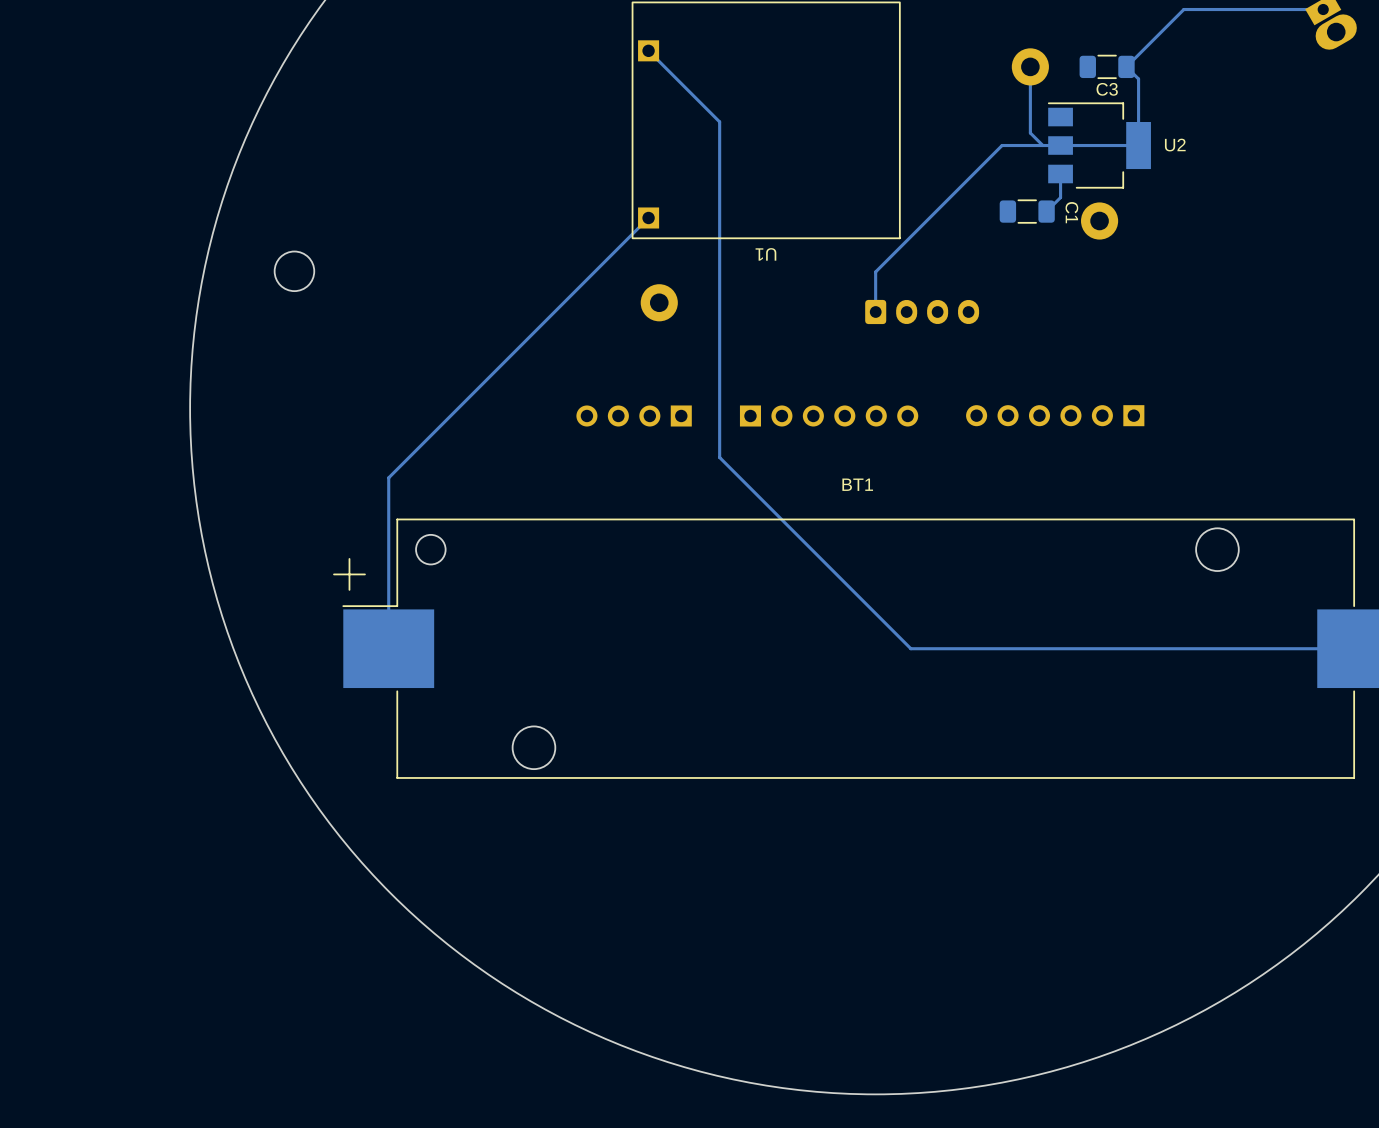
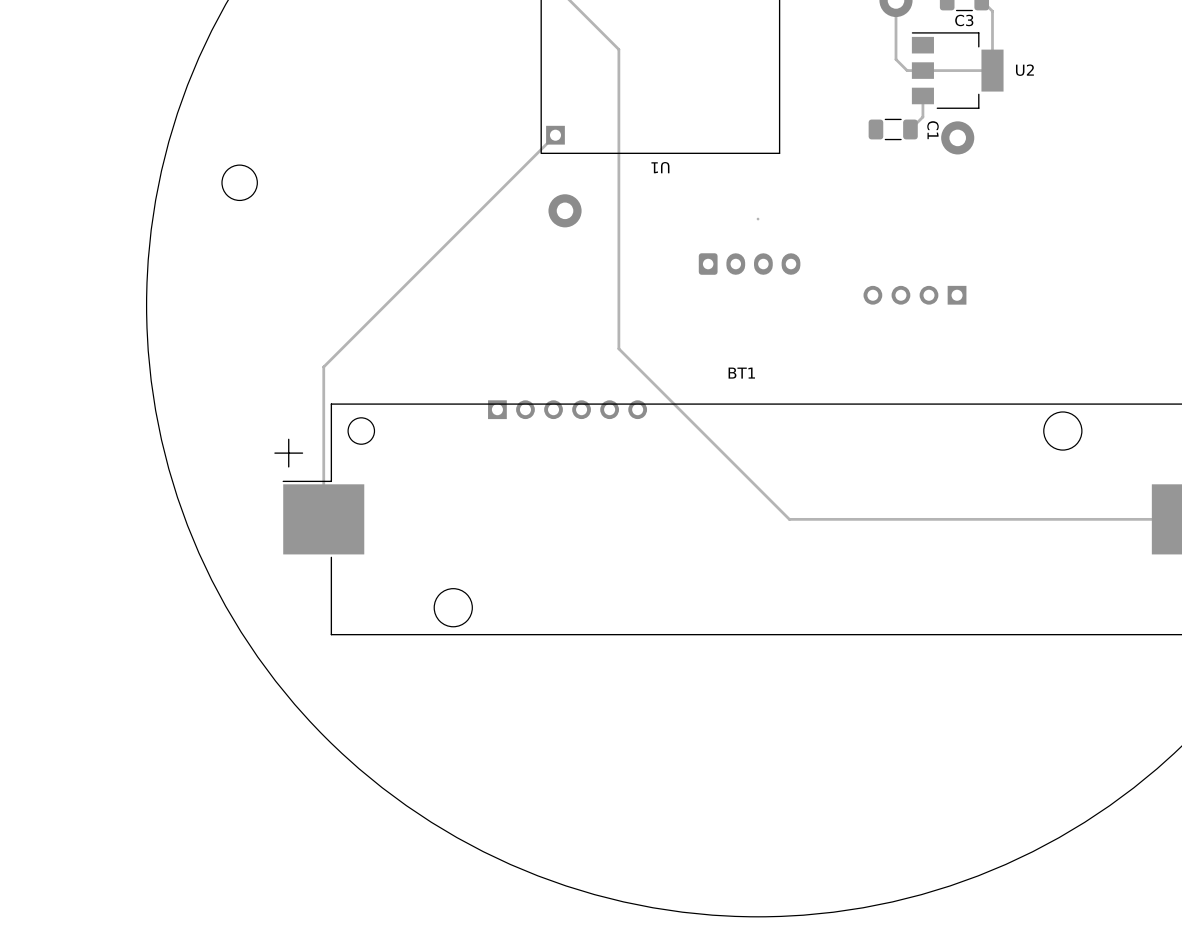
track: (1042, 145) (1002, 145) (875, 271) (875, 311) -> none
part position: (922, 311) -> (749, 264)
part: none -> (914, 295)
part: (634, 415) -> none
part position: (829, 415) -> (567, 409)
part: (1055, 415) -> none

